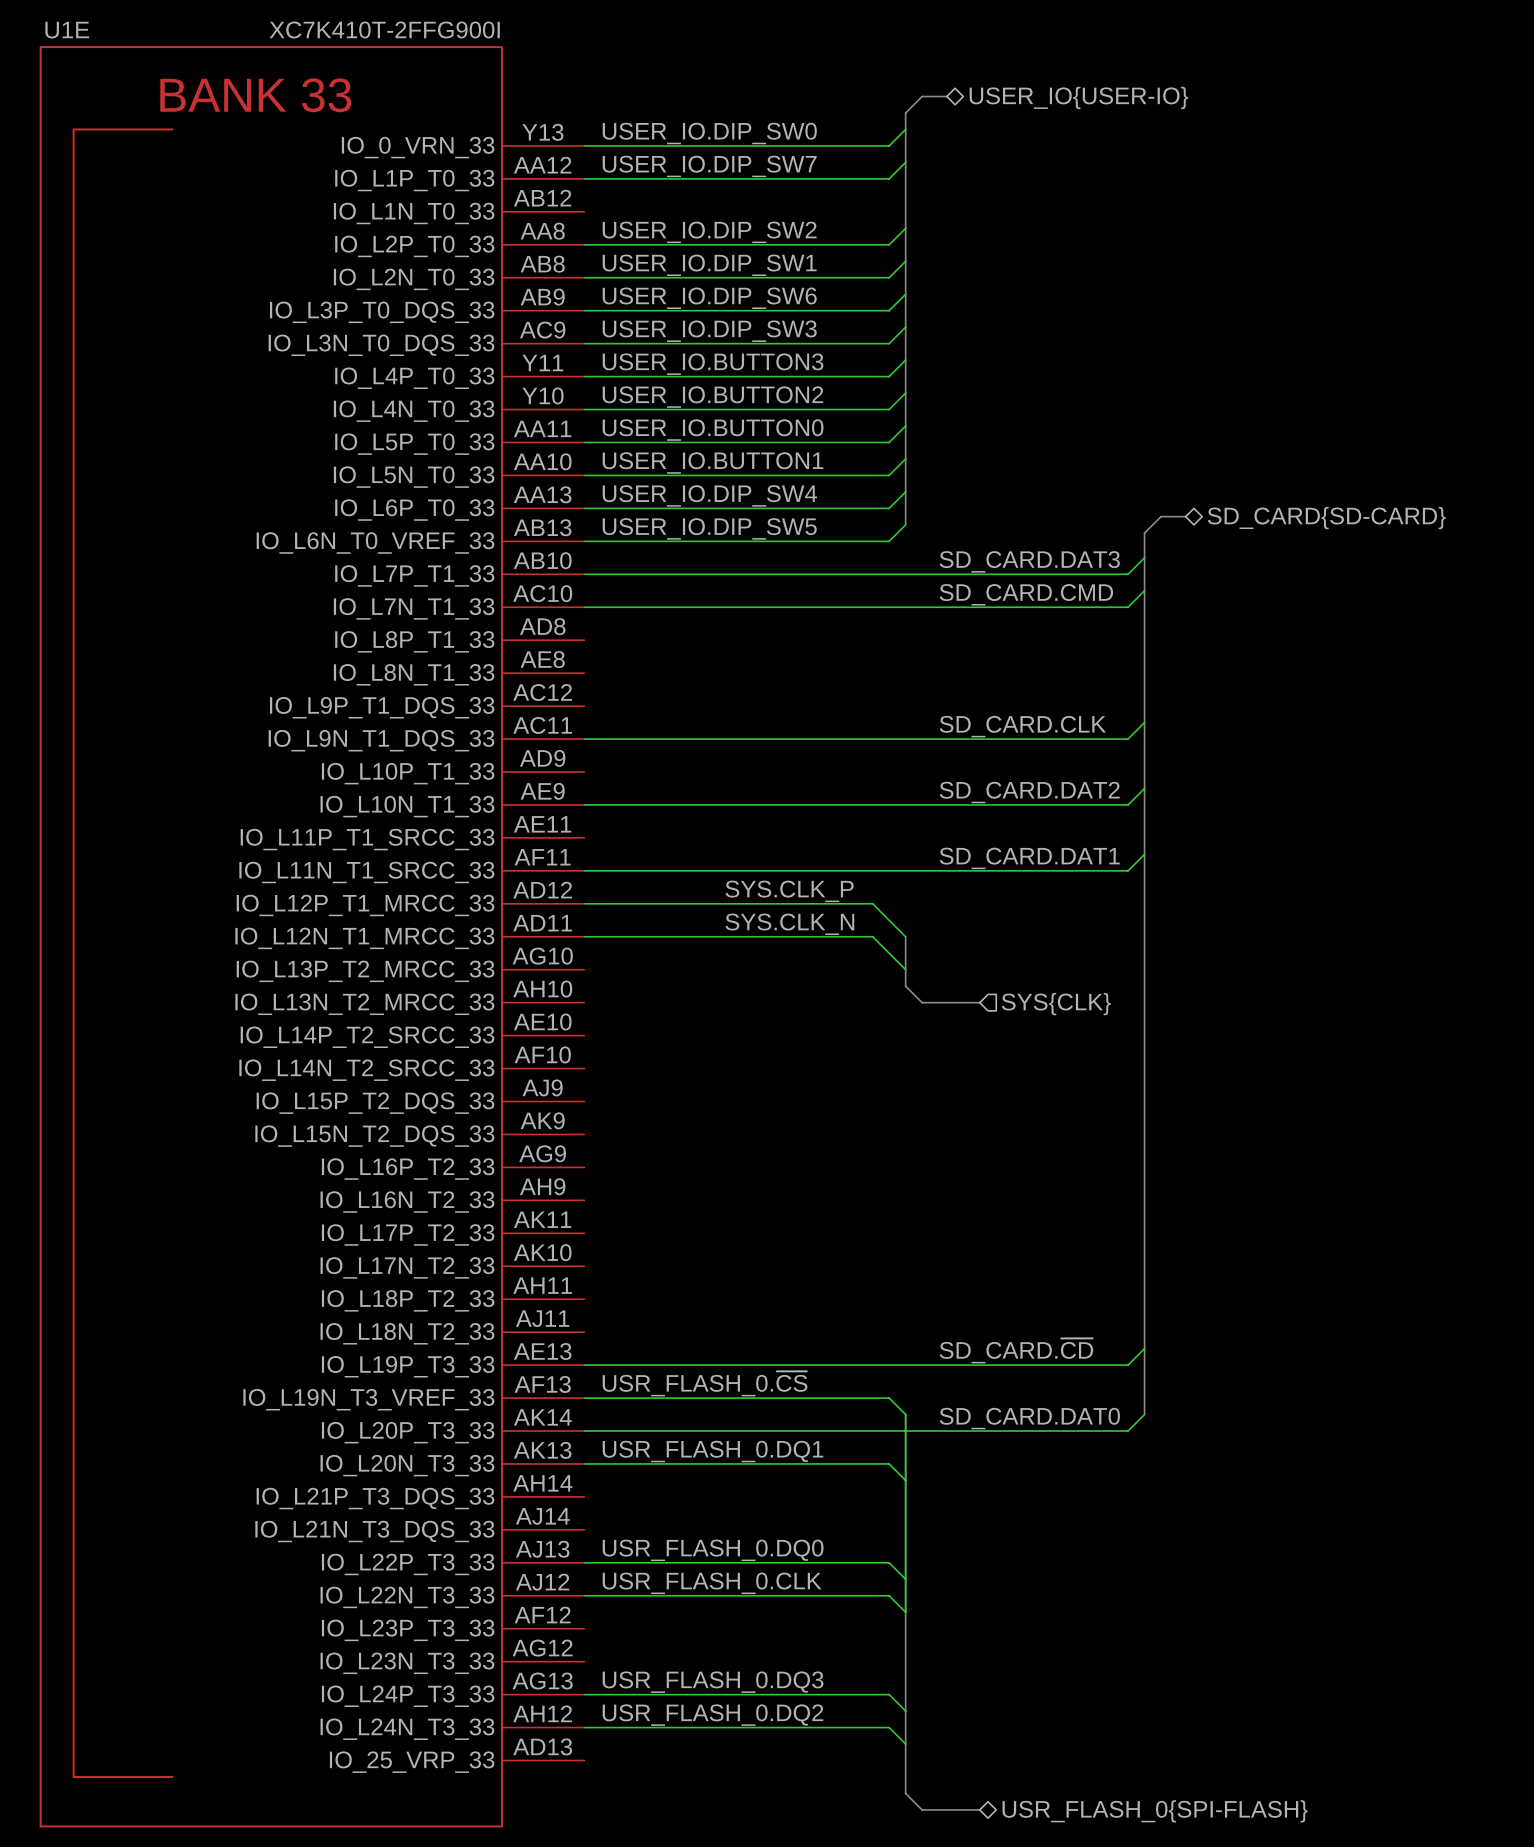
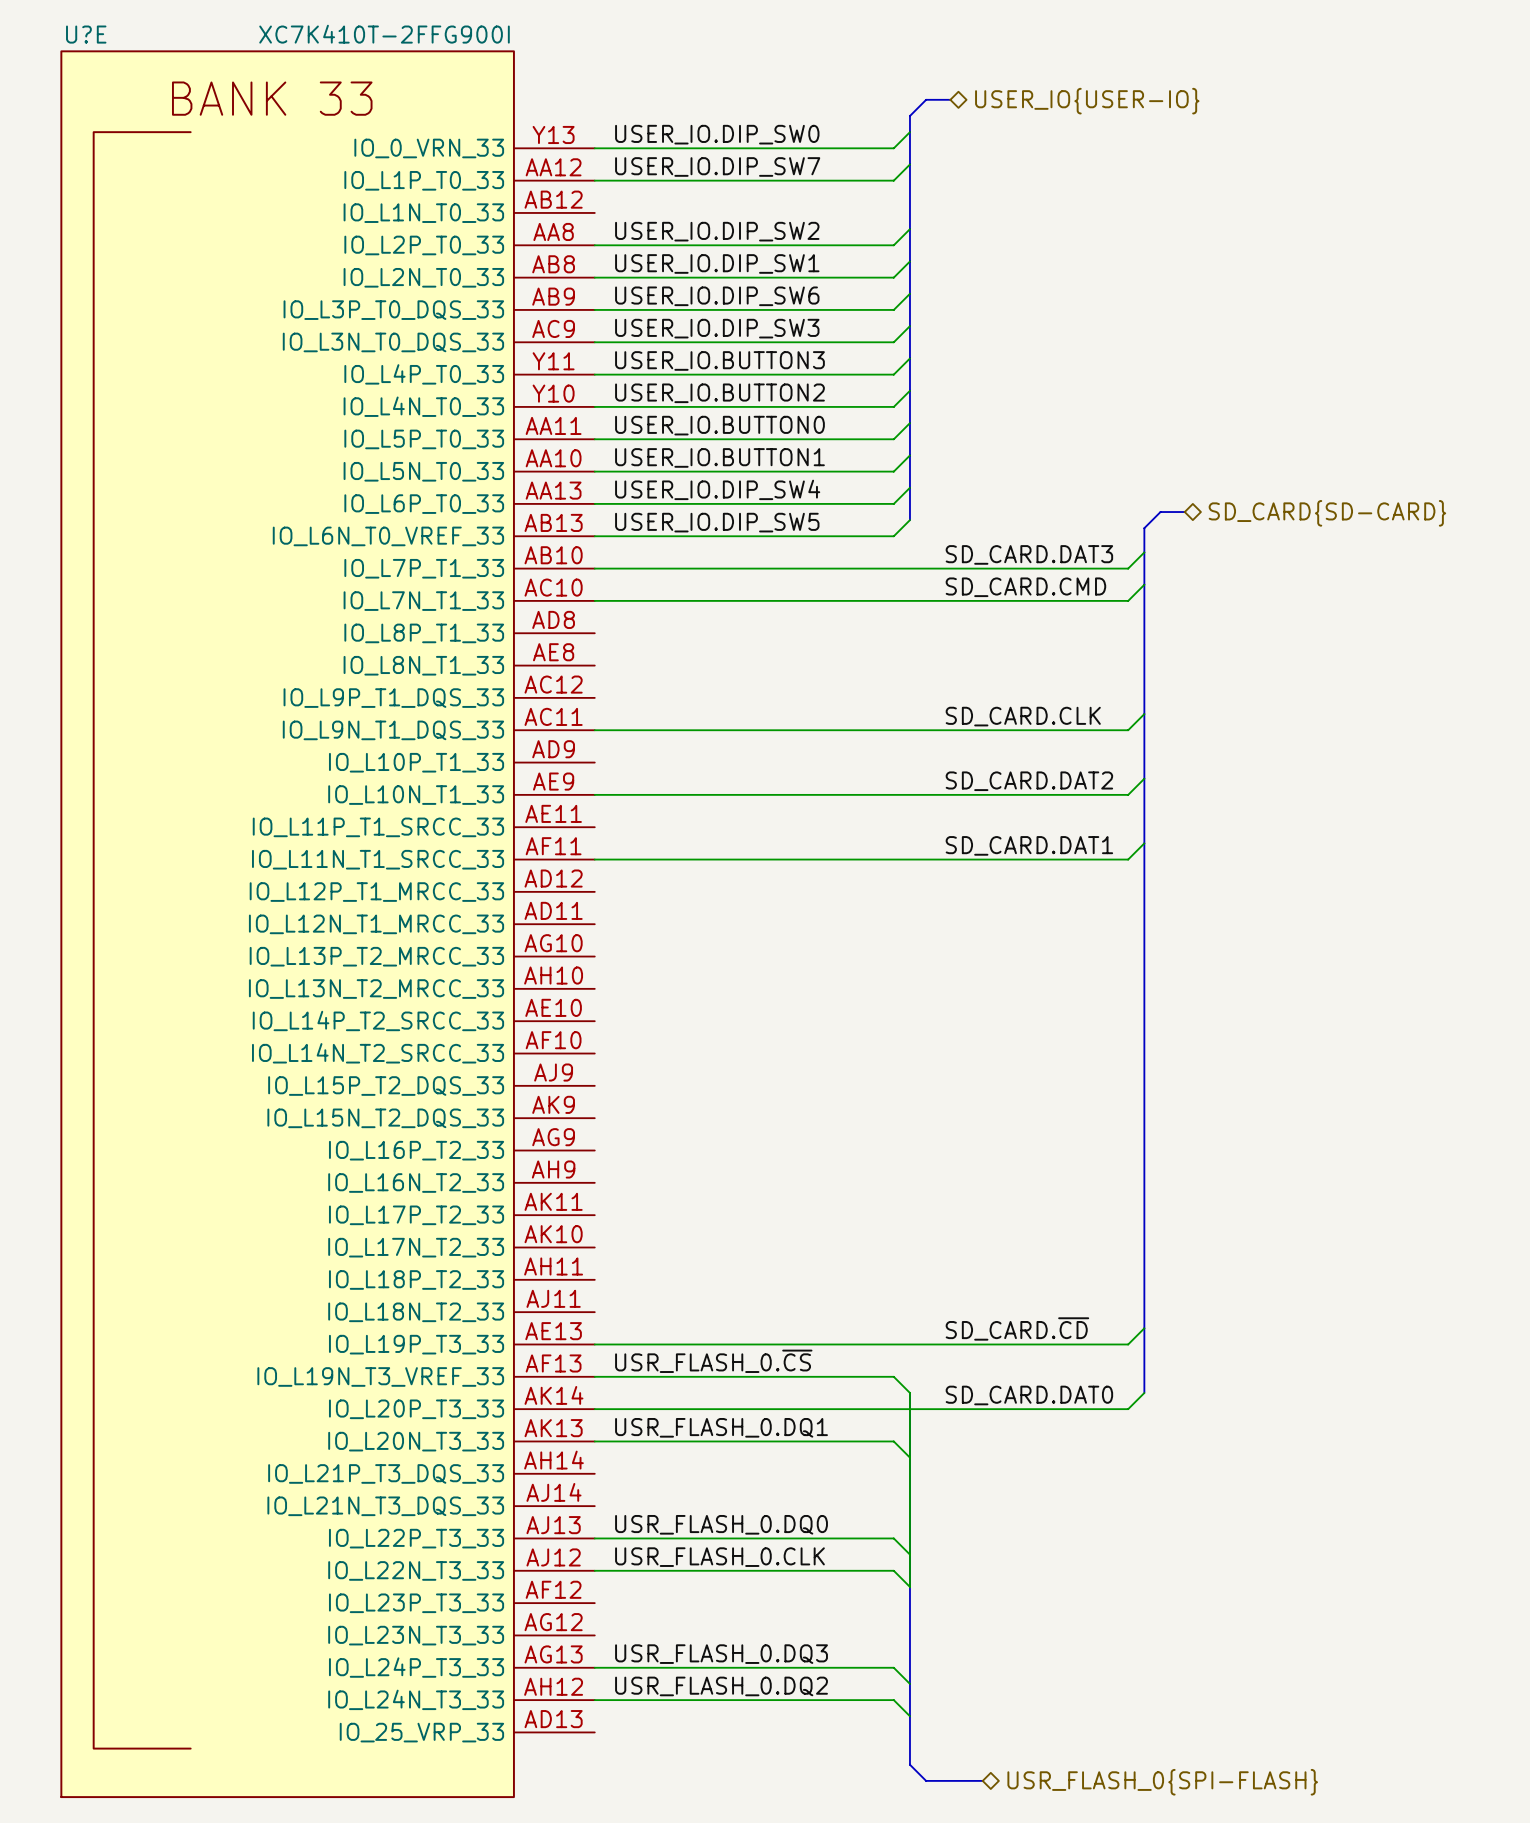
U1E name: U1E (67, 30) -> U?E (86, 34)
label: SYS.CLK_P (789, 891) -> none
wire: (584, 903) (872, 903) (905, 936) -> none
label: SYS.CLK_N (789, 924) -> none
wire: (584, 936) (872, 936) (905, 969) -> none
bus: (905, 936) (905, 986) (922, 1002) (979, 1002) -> none
hierarchical label: SYS{CLK} (1056, 1004) -> none

